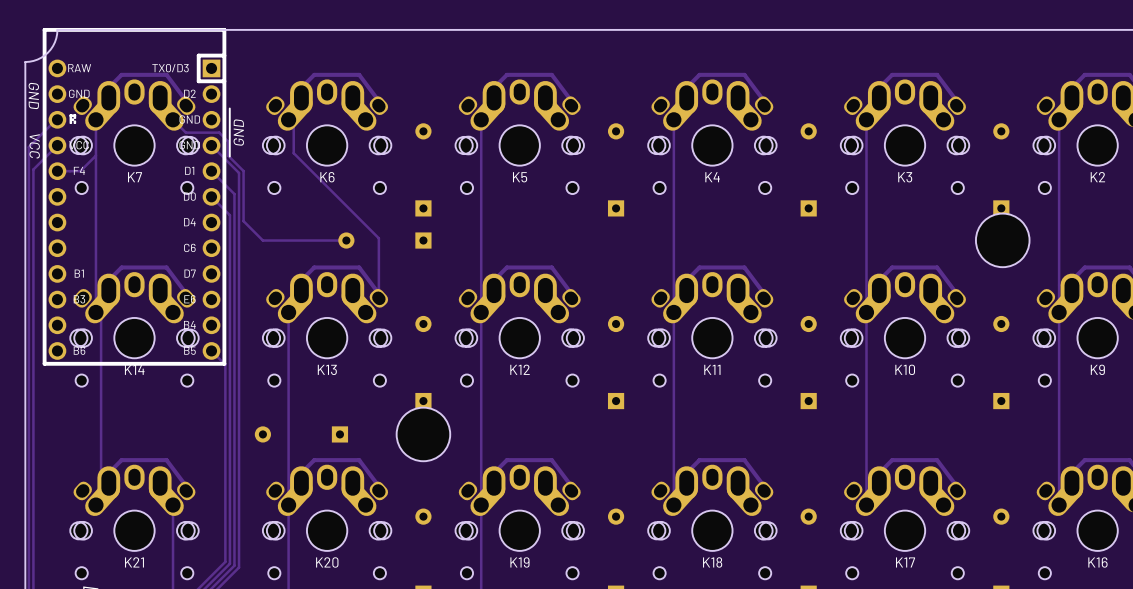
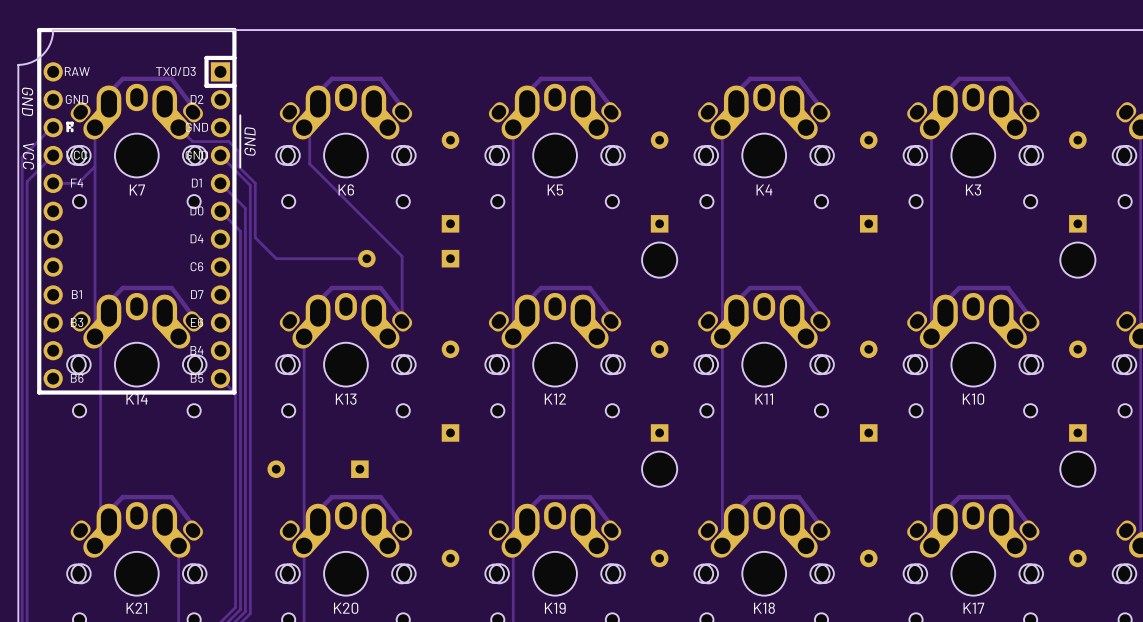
part footprint: [975, 213, 1030, 268] -> [1060, 242, 1096, 278]
part: none -> (659, 260)
part: (423, 434) -> none
part: none -> (659, 469)
part: none -> (1077, 469)

